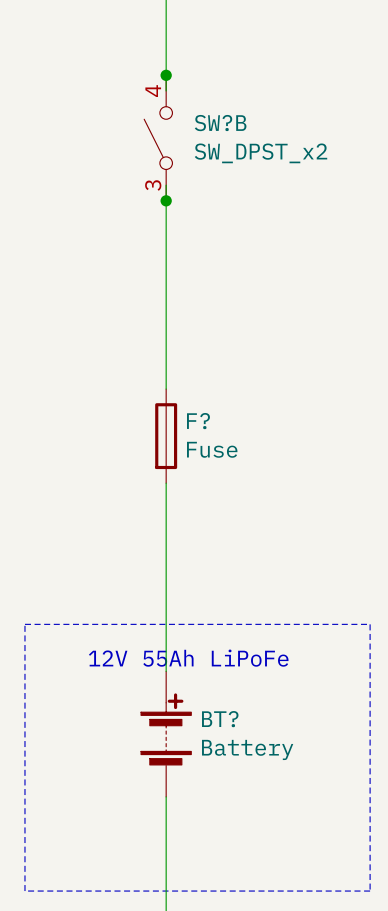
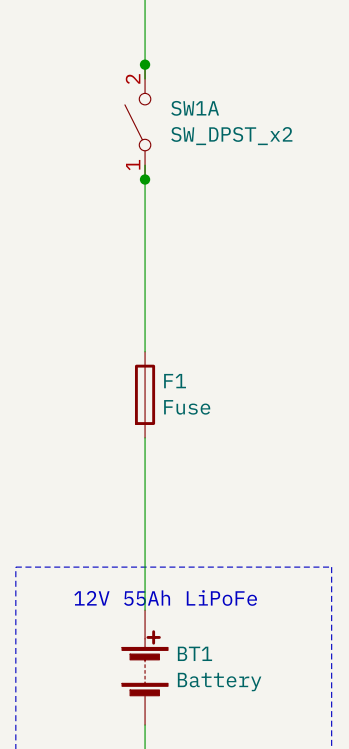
SW?B pin number: 4 (153, 91) -> 2 (133, 79)
SW?B name: SW?B (220, 123) -> SW1A (195, 108)
SW?B pin number: 3 (153, 185) -> 1 (133, 165)
F? name: F? (198, 421) -> F1 (175, 381)
BT? name: BT? (220, 719) -> BT1 (194, 653)

